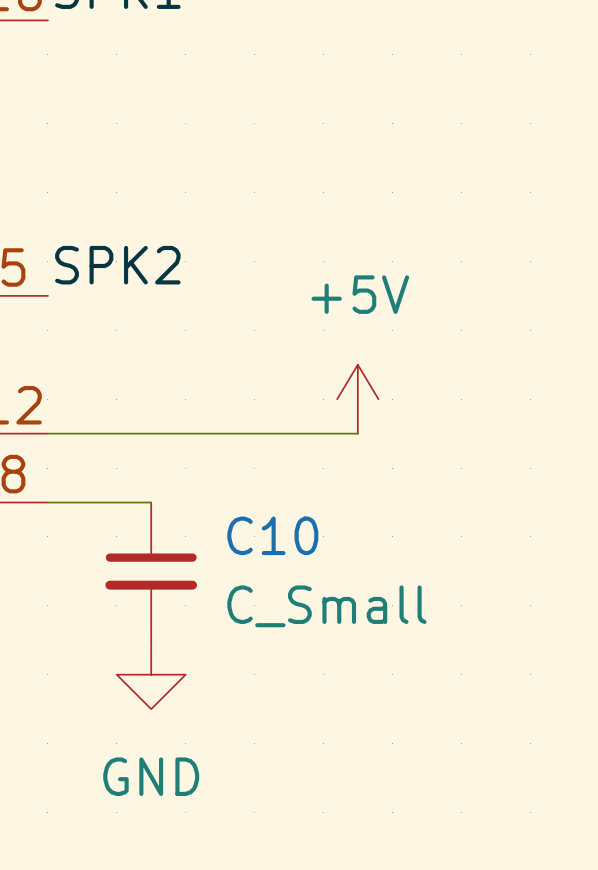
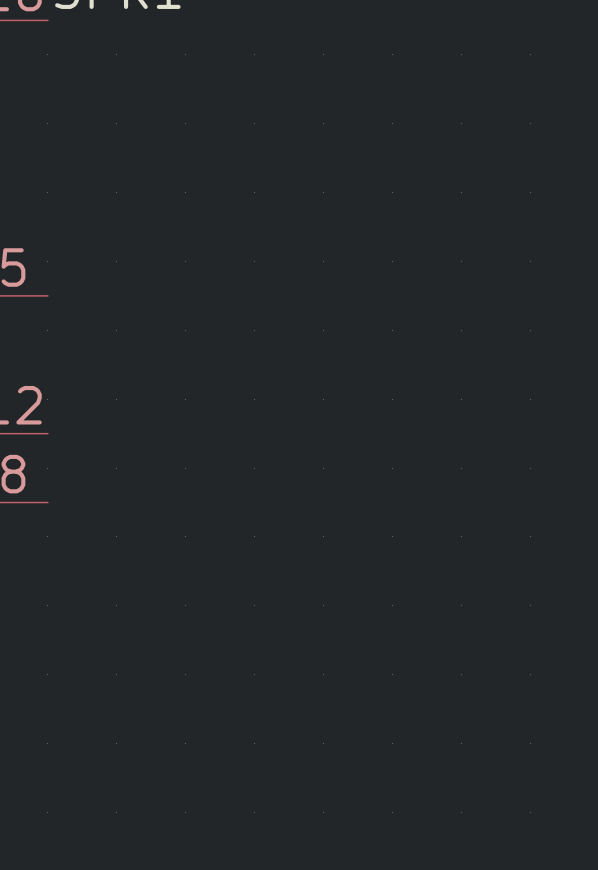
label: SPK2 (117, 265) -> none
power symbol: +5V (357, 399) -> none
wire: (47, 433) (357, 433) -> none
wire: (47, 502) (151, 502) -> none
C10: C_Small (151, 571) -> none
power symbol: GND (151, 674) -> none

